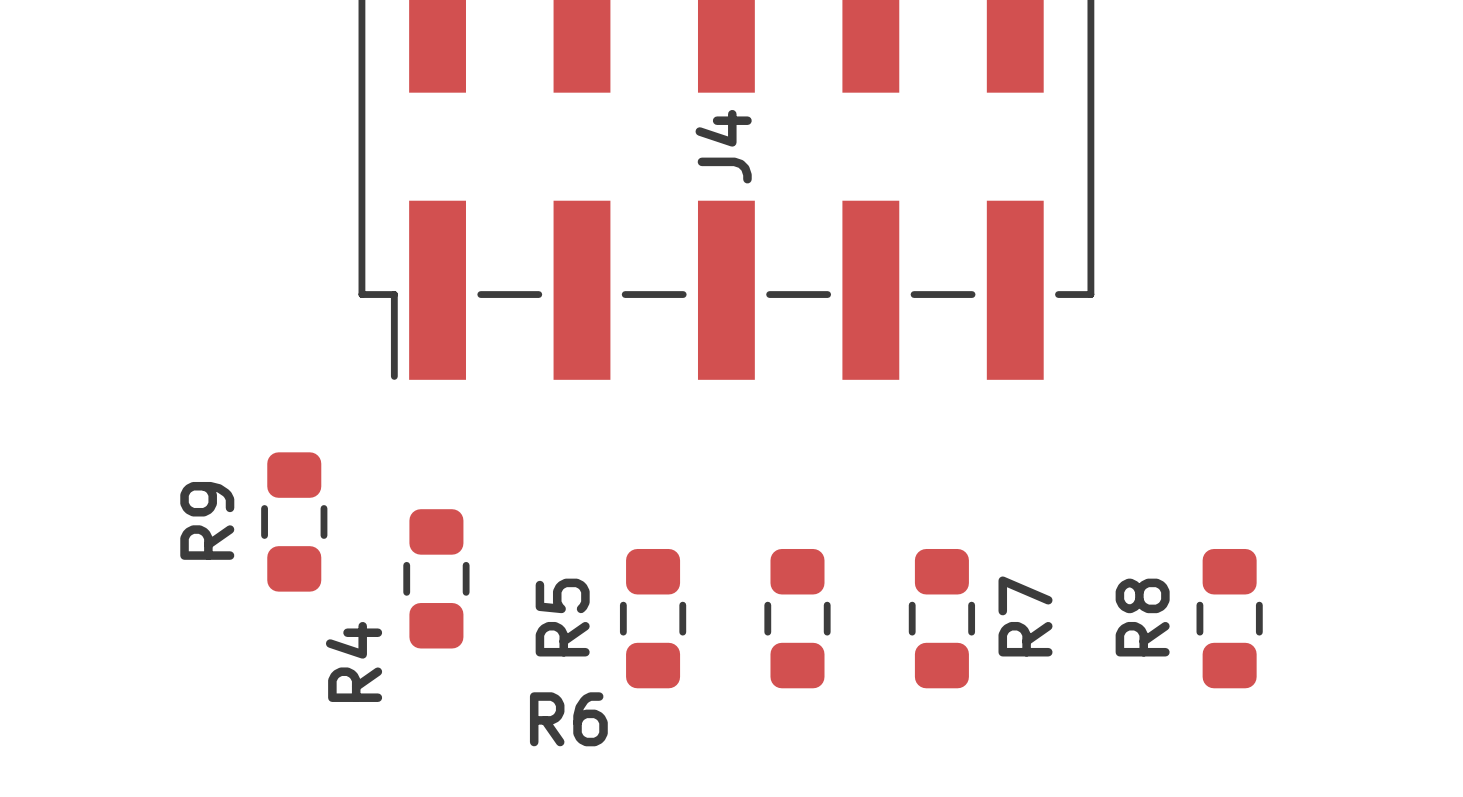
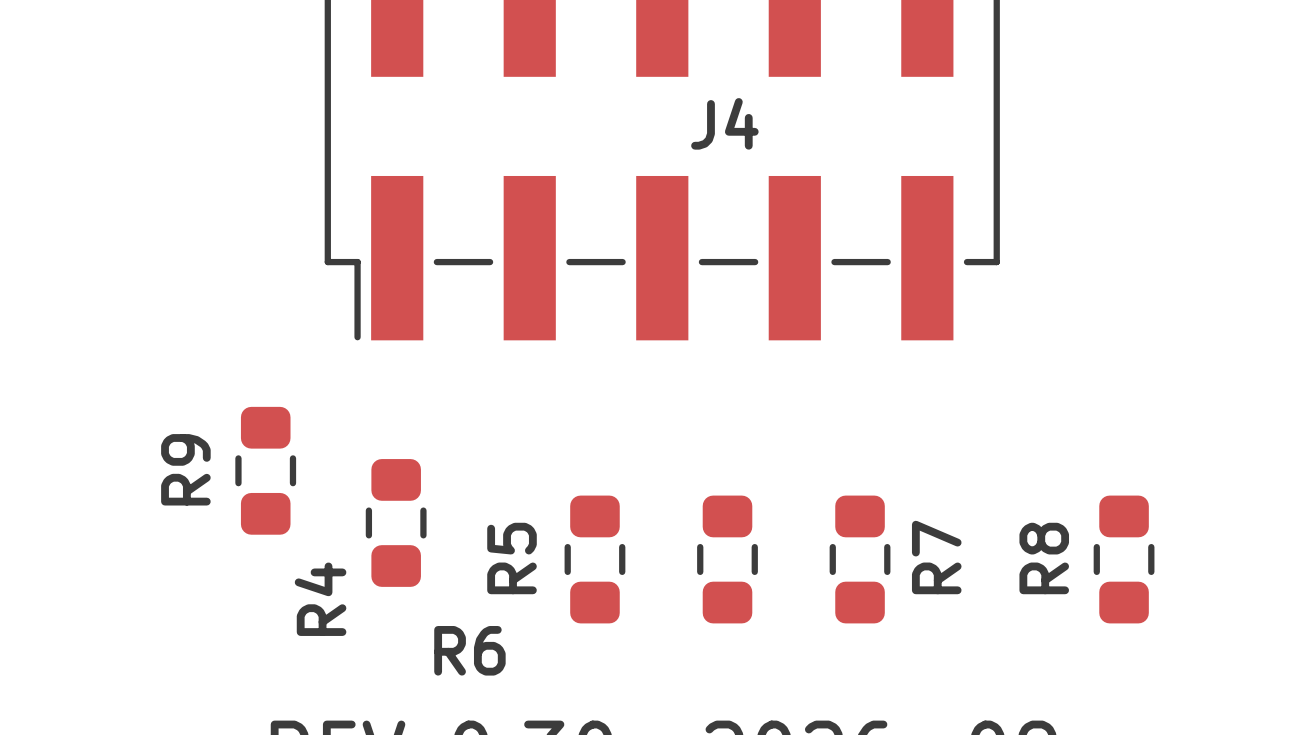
J4 name rotation: 0° (723, 146) -> 90° clockwise (724, 123)
R6 name position: R6 (568, 719) -> R6 (469, 650)

